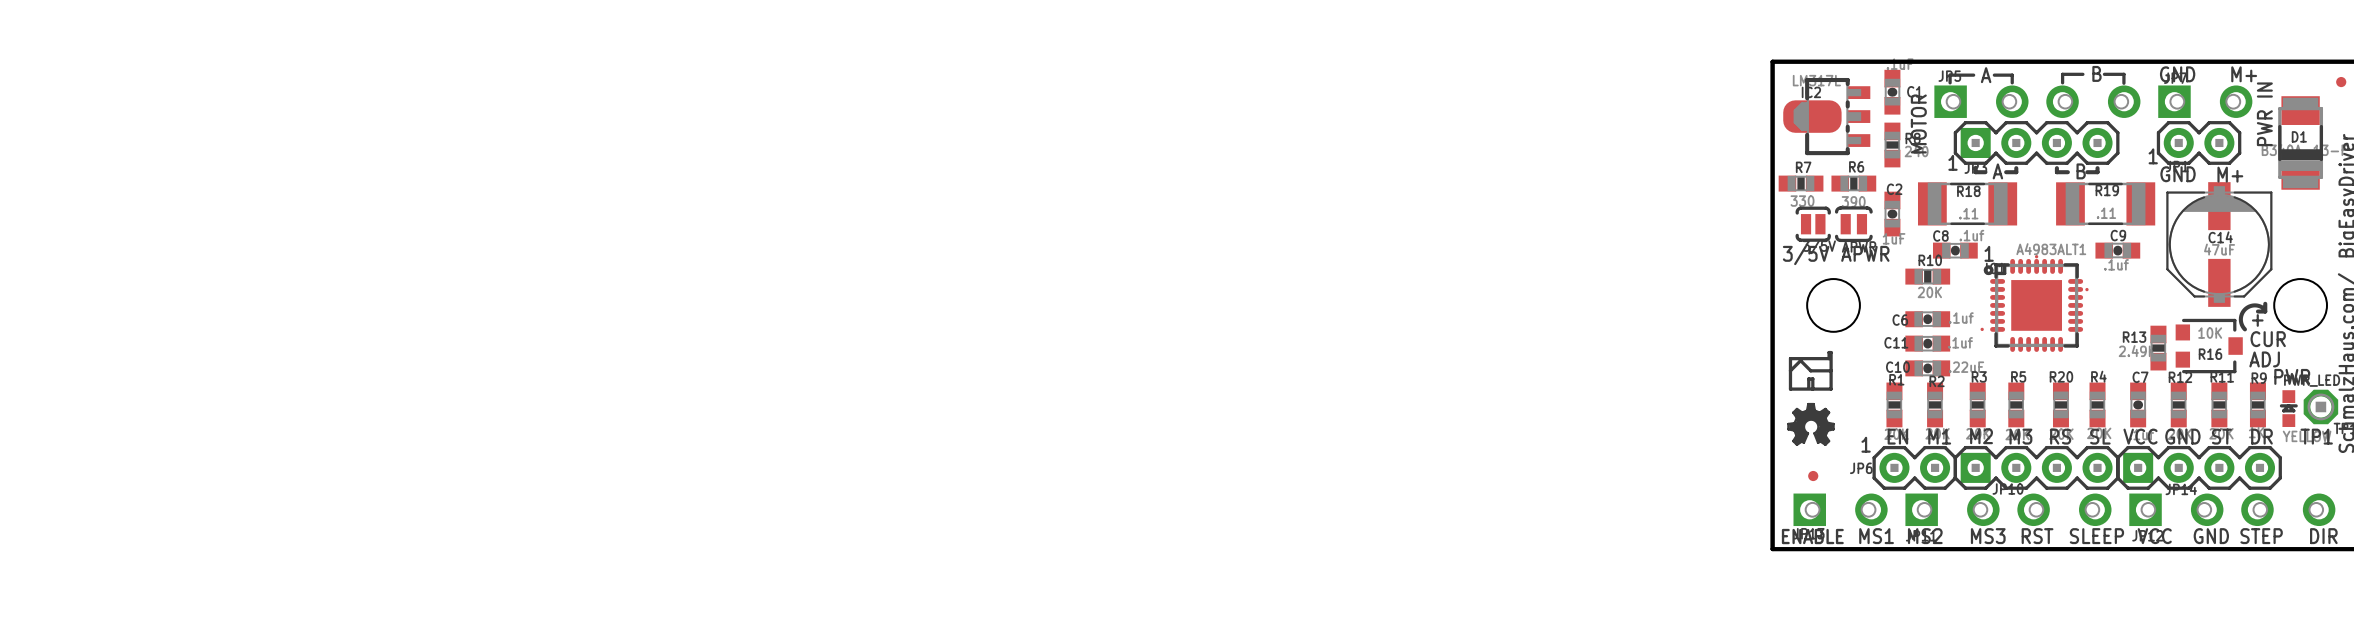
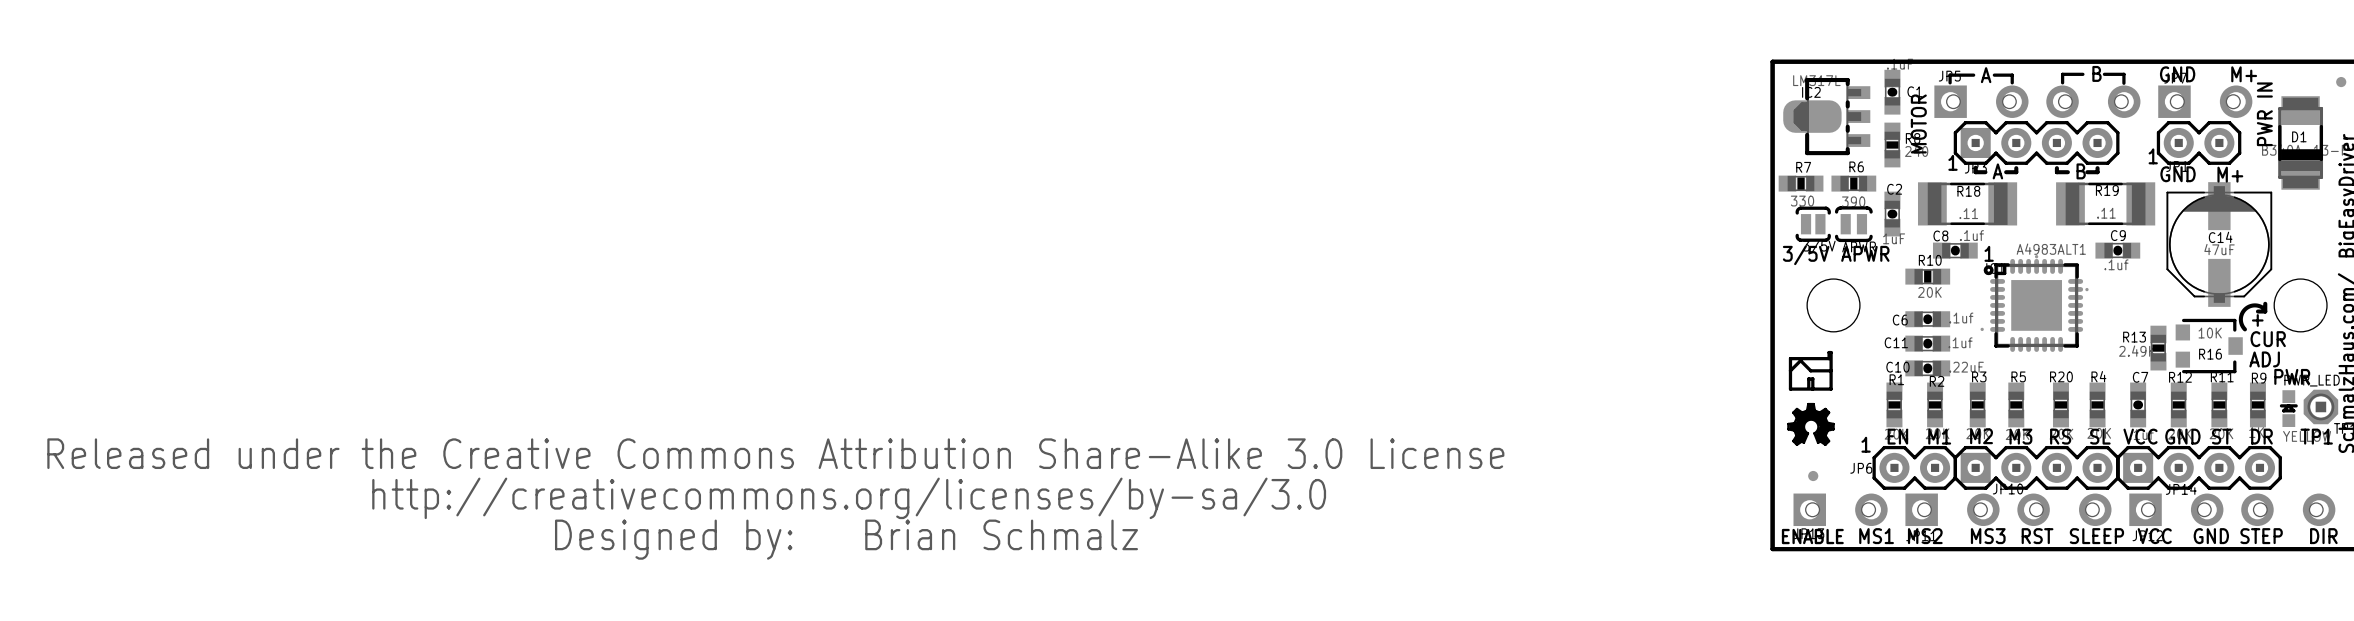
drawing: none -> [47, 438, 1505, 560]
text: none -> Brian Schmalz (1001, 534)

